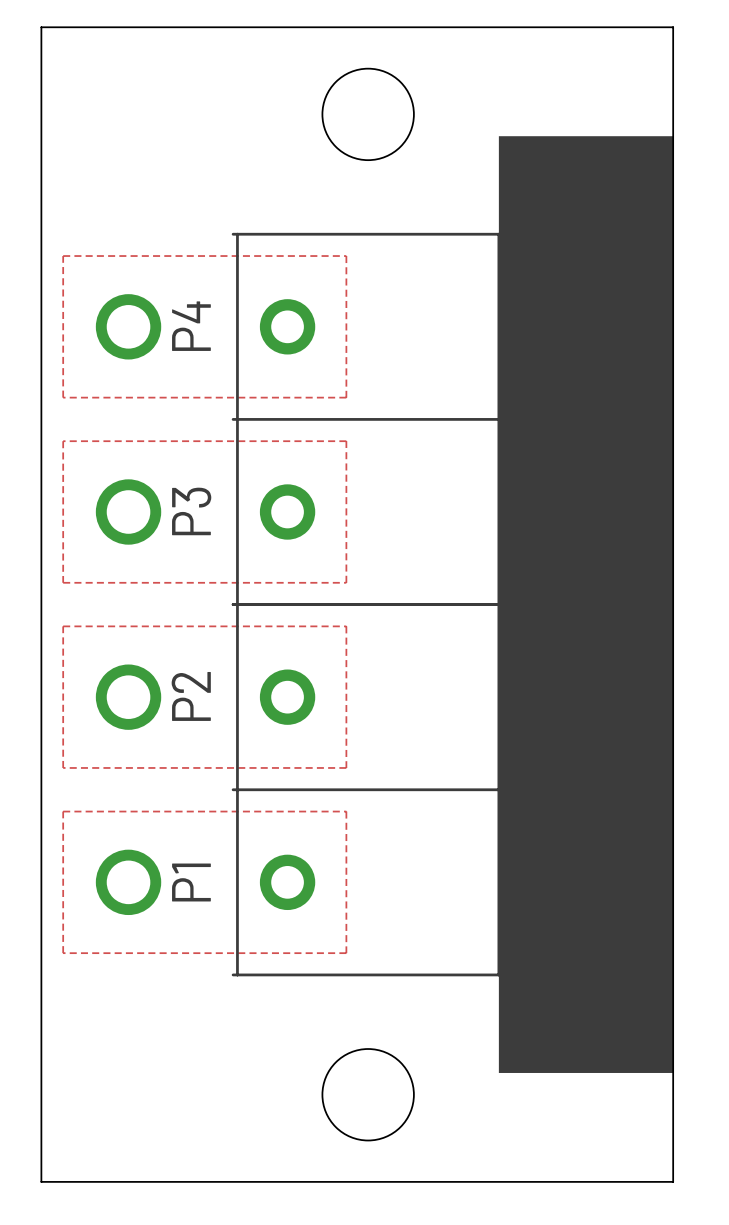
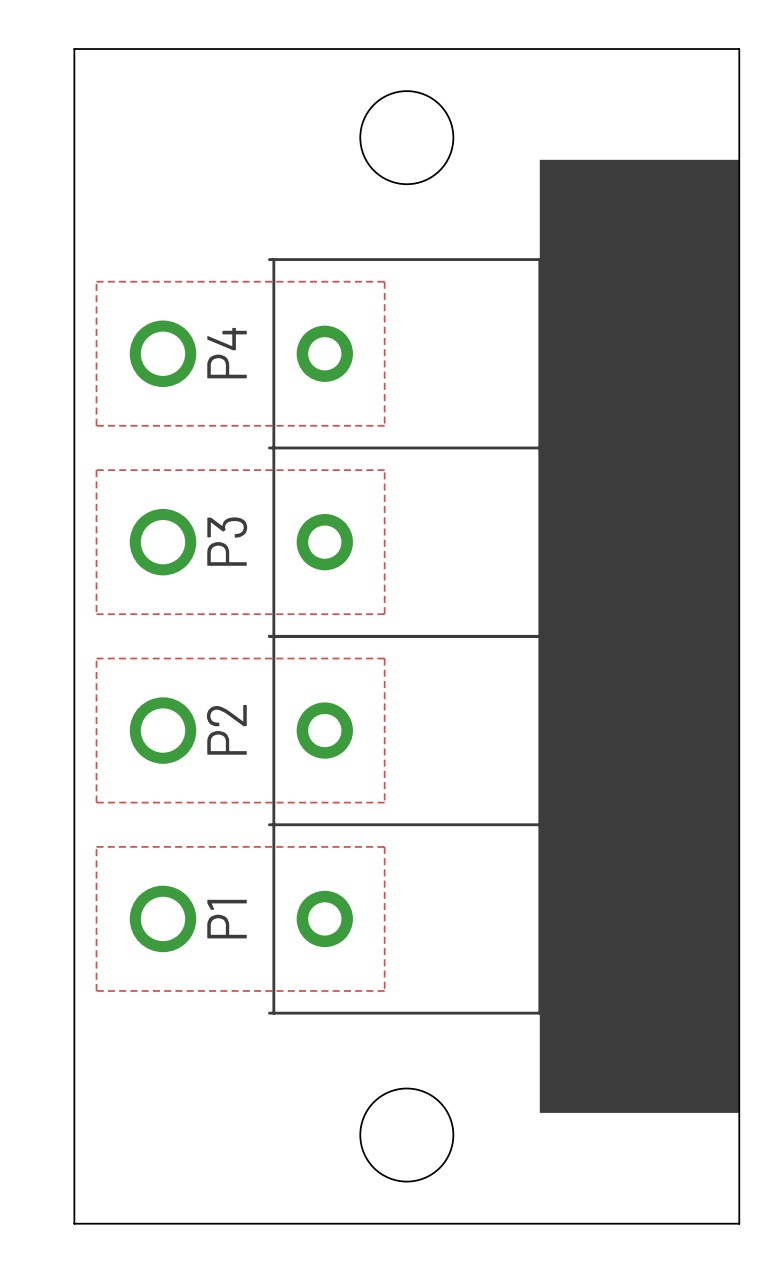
board edge: (673, 27) (673, 1181) -> (717, 49) (739, 49) (739, 1223) (717, 1223)
drawing shape: [498, 136, 674, 1073] -> [539, 159, 740, 1113]

